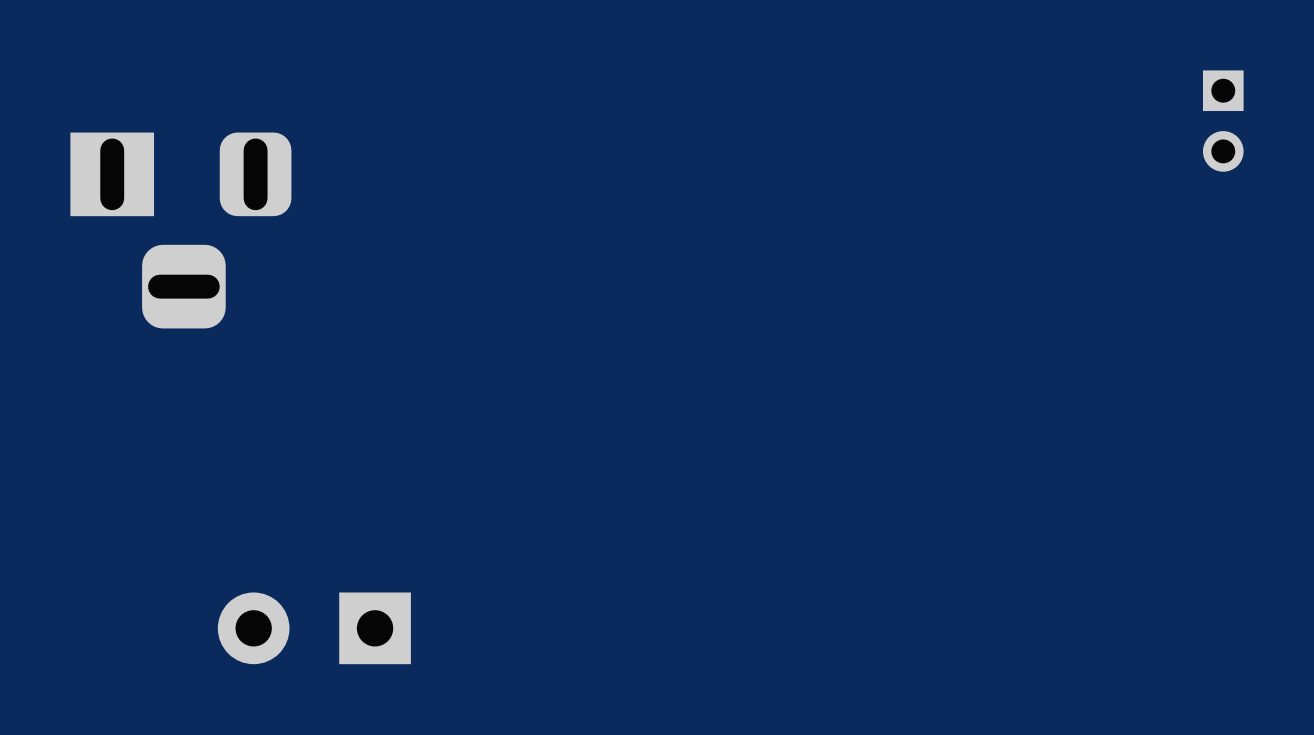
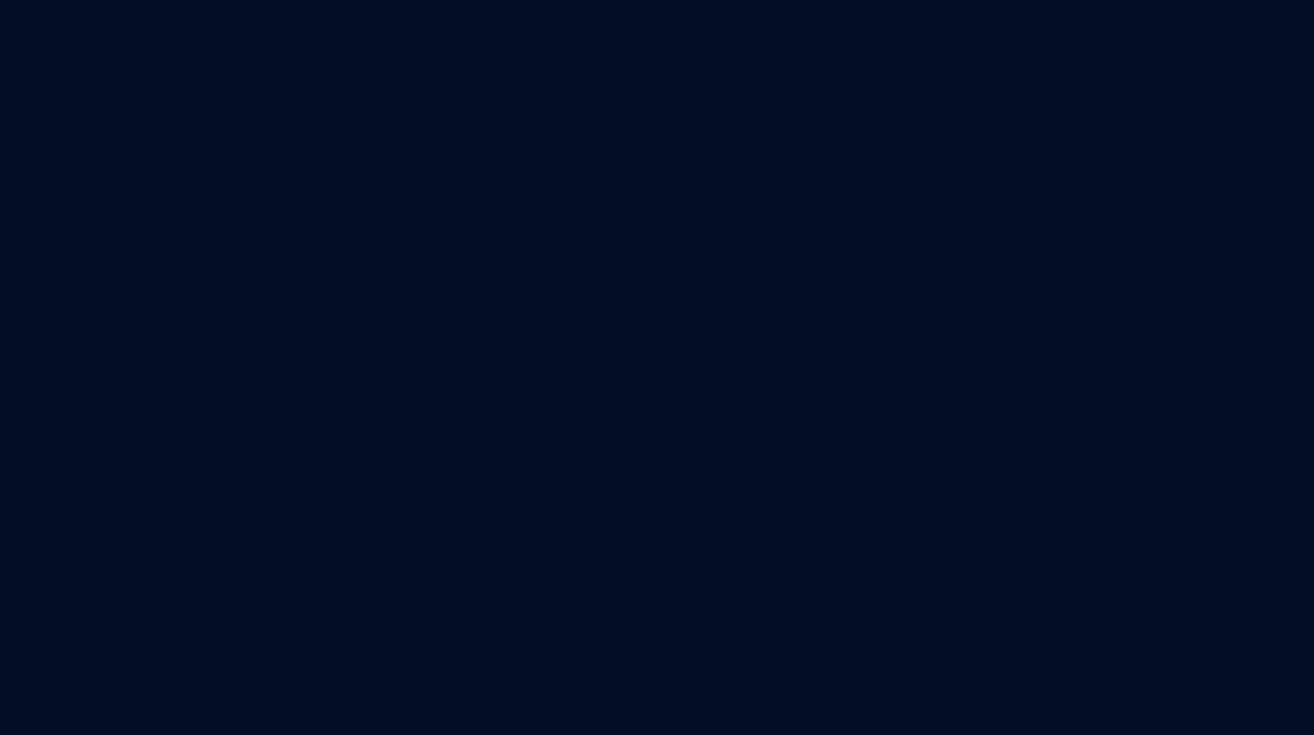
part: (1223, 121) -> none
part: (180, 230) -> none
part: (314, 628) -> none

